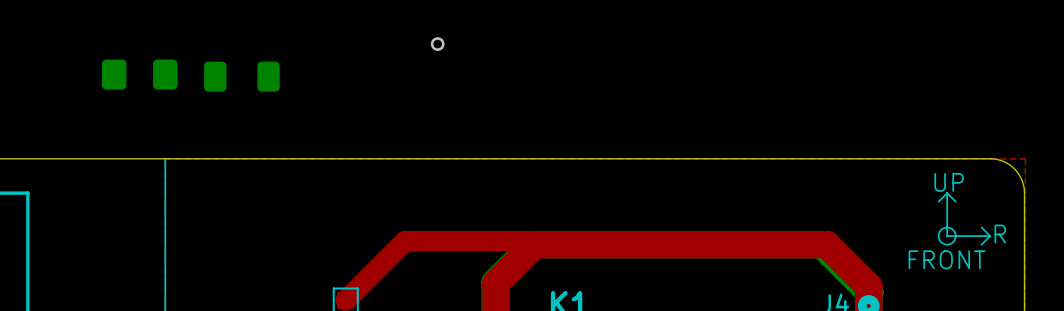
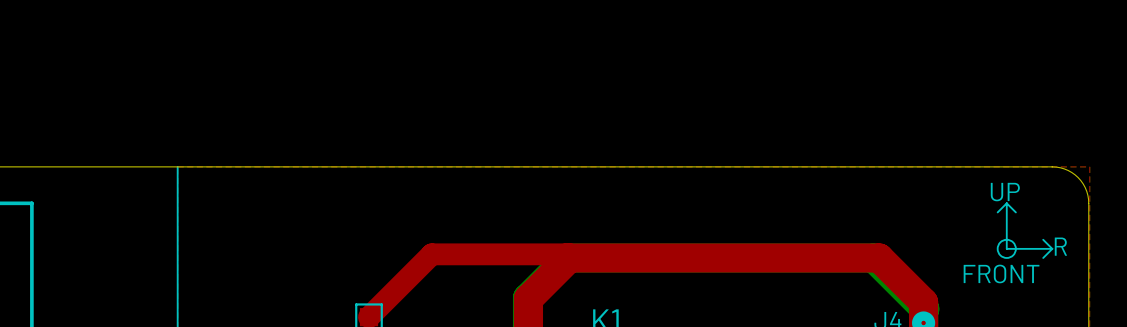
via: (437, 44) -> none
part: (139, 74) -> none
part: (241, 76) -> none

